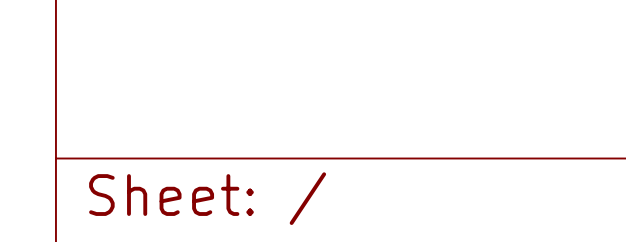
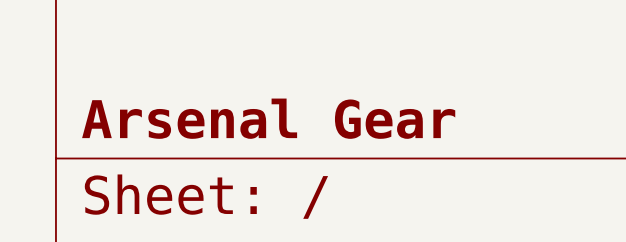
title block: none -> Arsenal Gear (268, 118)

